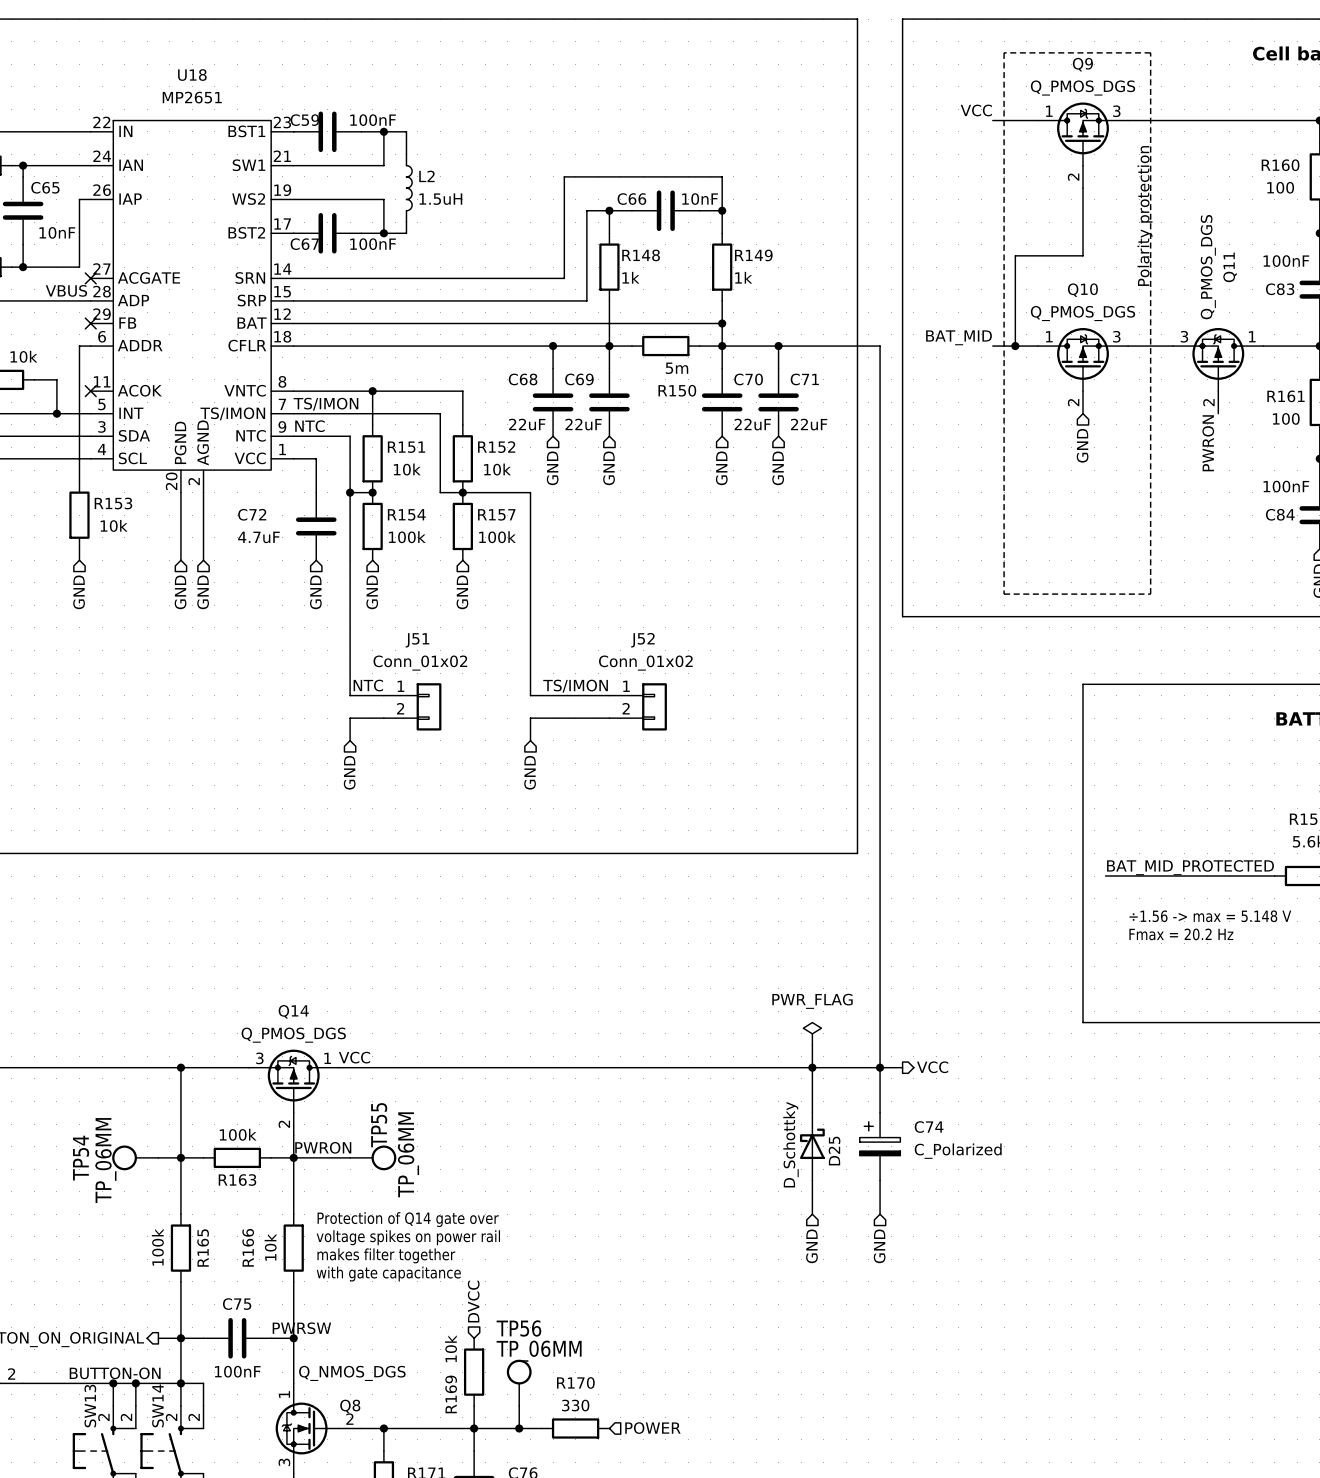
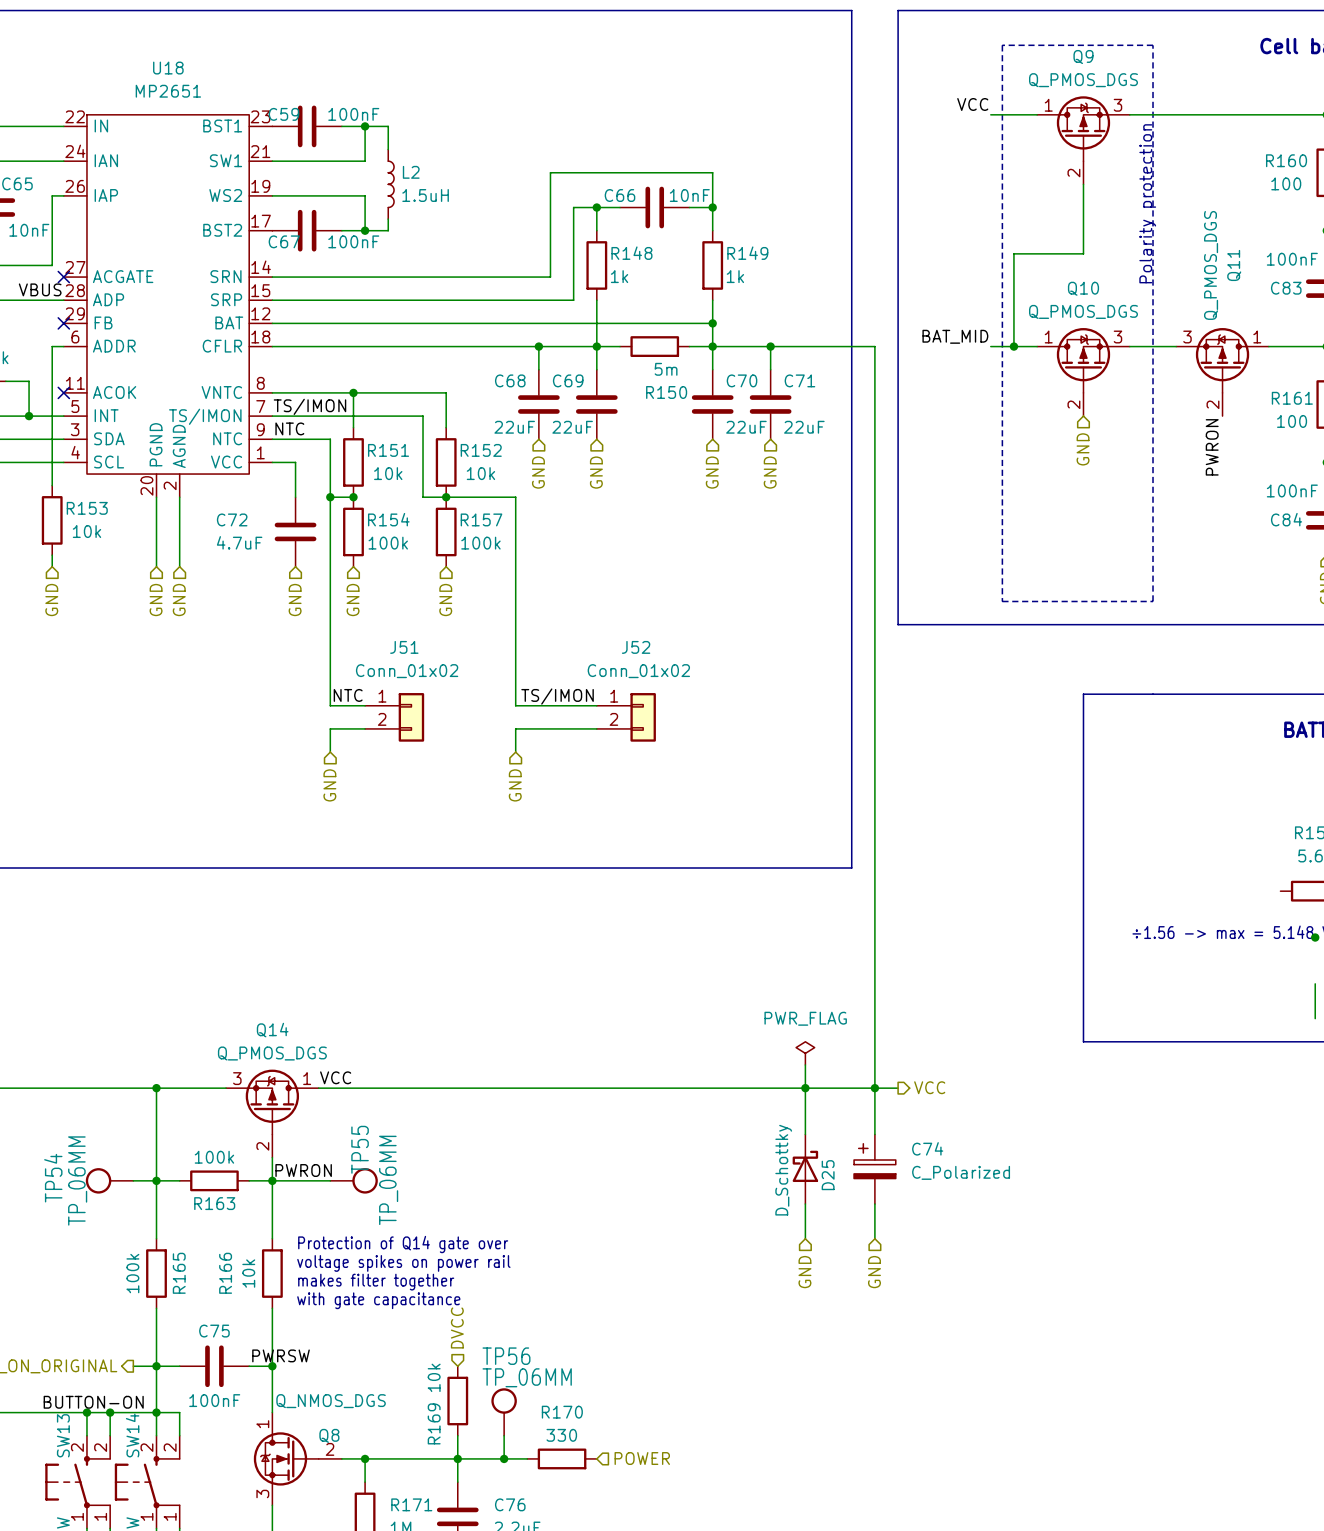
label: BAT_MID_PROTECTED (1190, 867) -> none
wire: (1105, 876) (1274, 876) -> none
junction: none -> (1315, 937)
text: Fmax = 20.2 Hz (1181, 934) -> none
wire: none -> (1315, 983) (1315, 1018)

